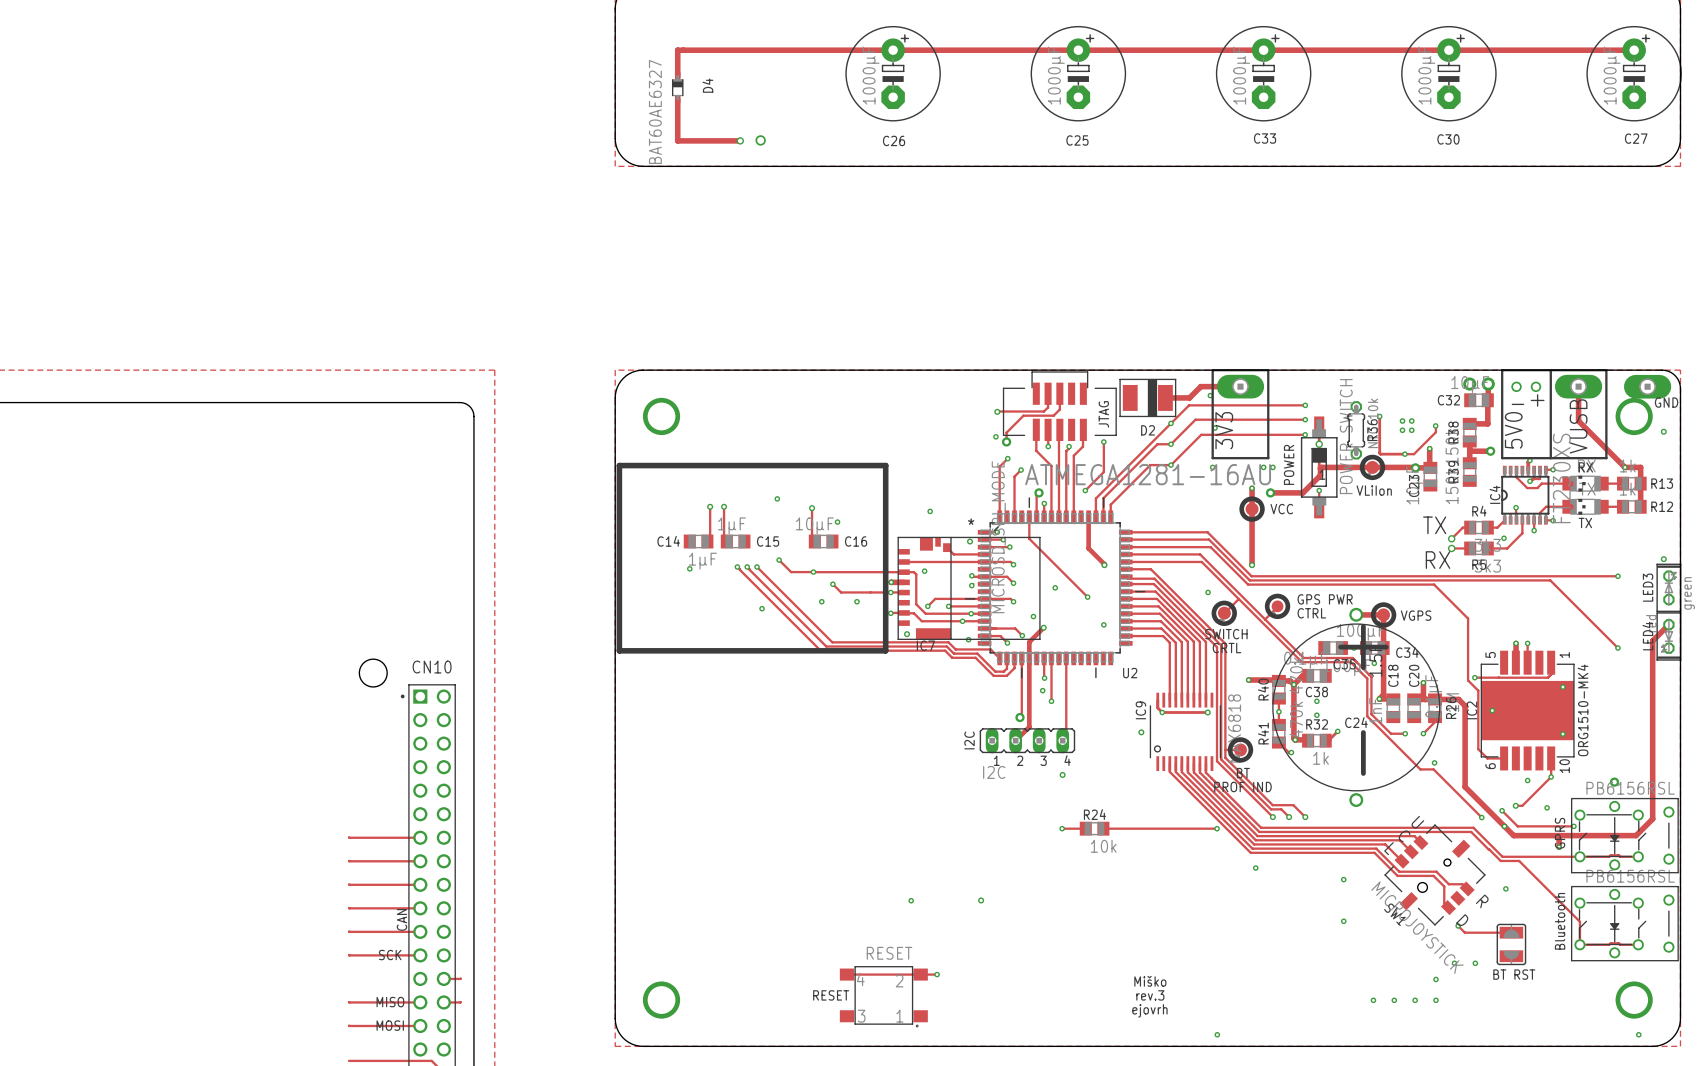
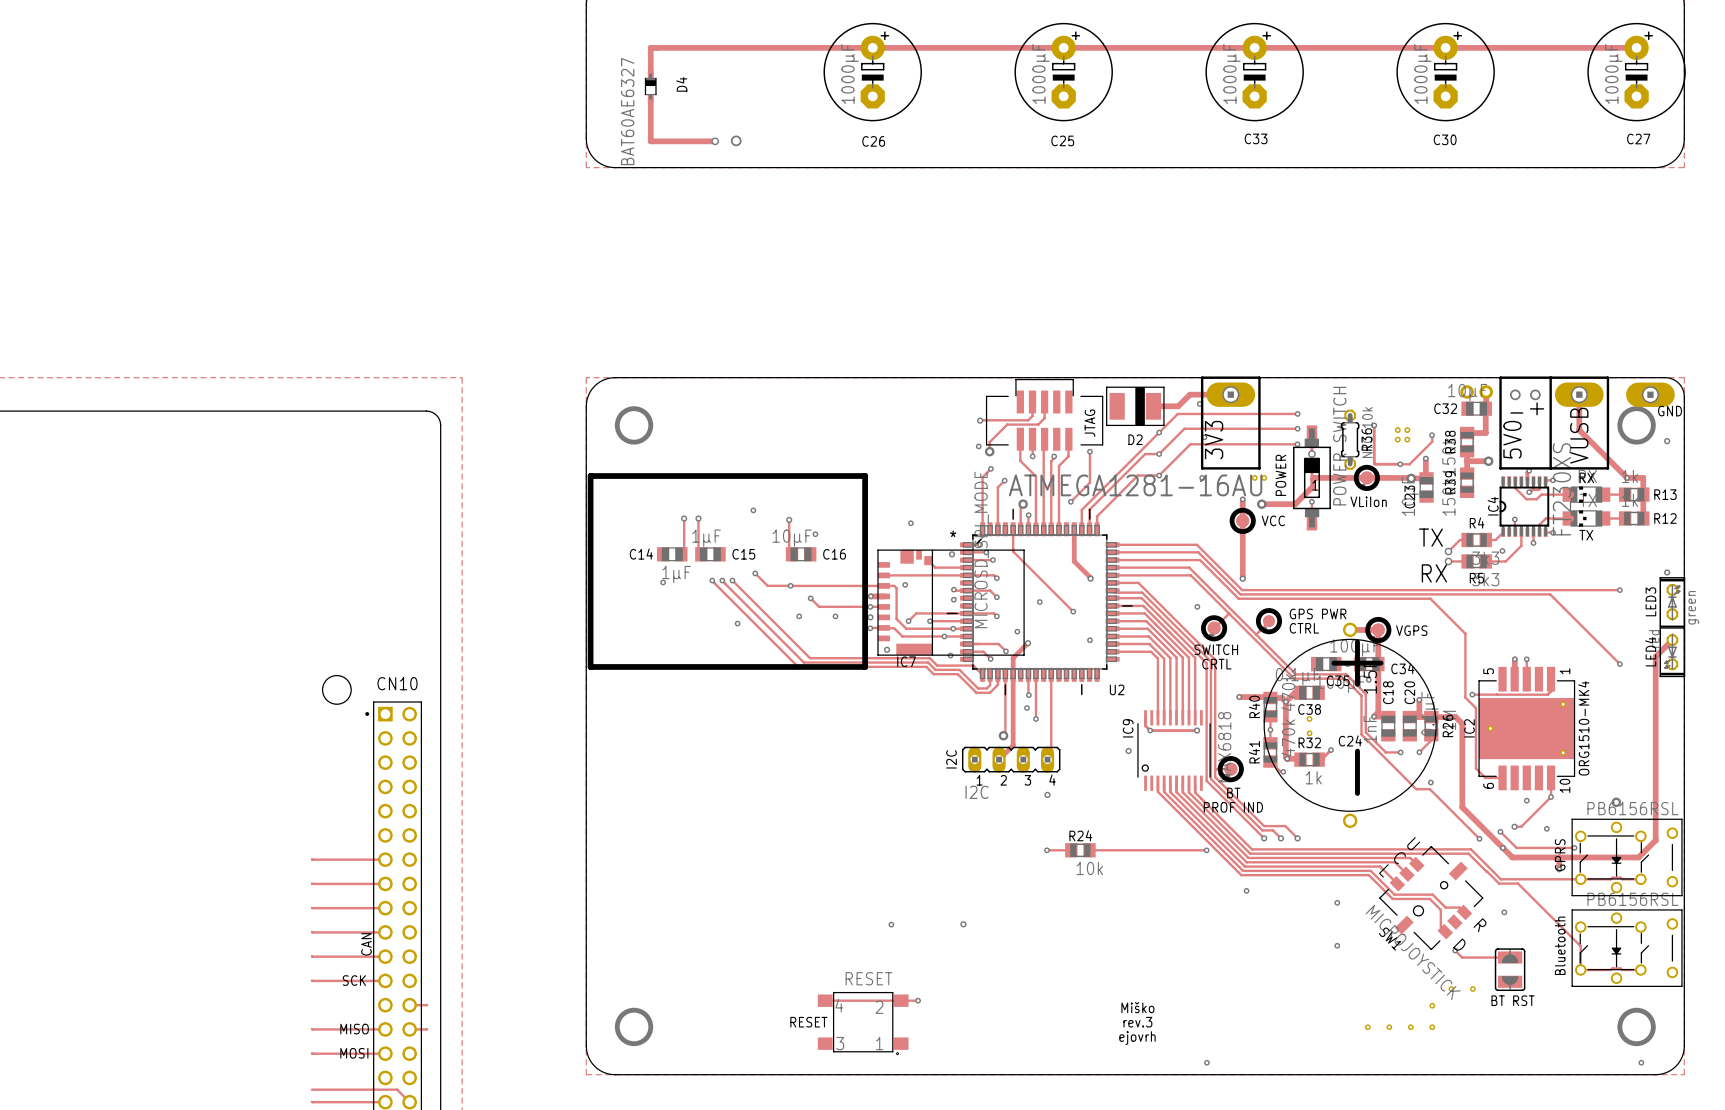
via: none -> (870, 617)

